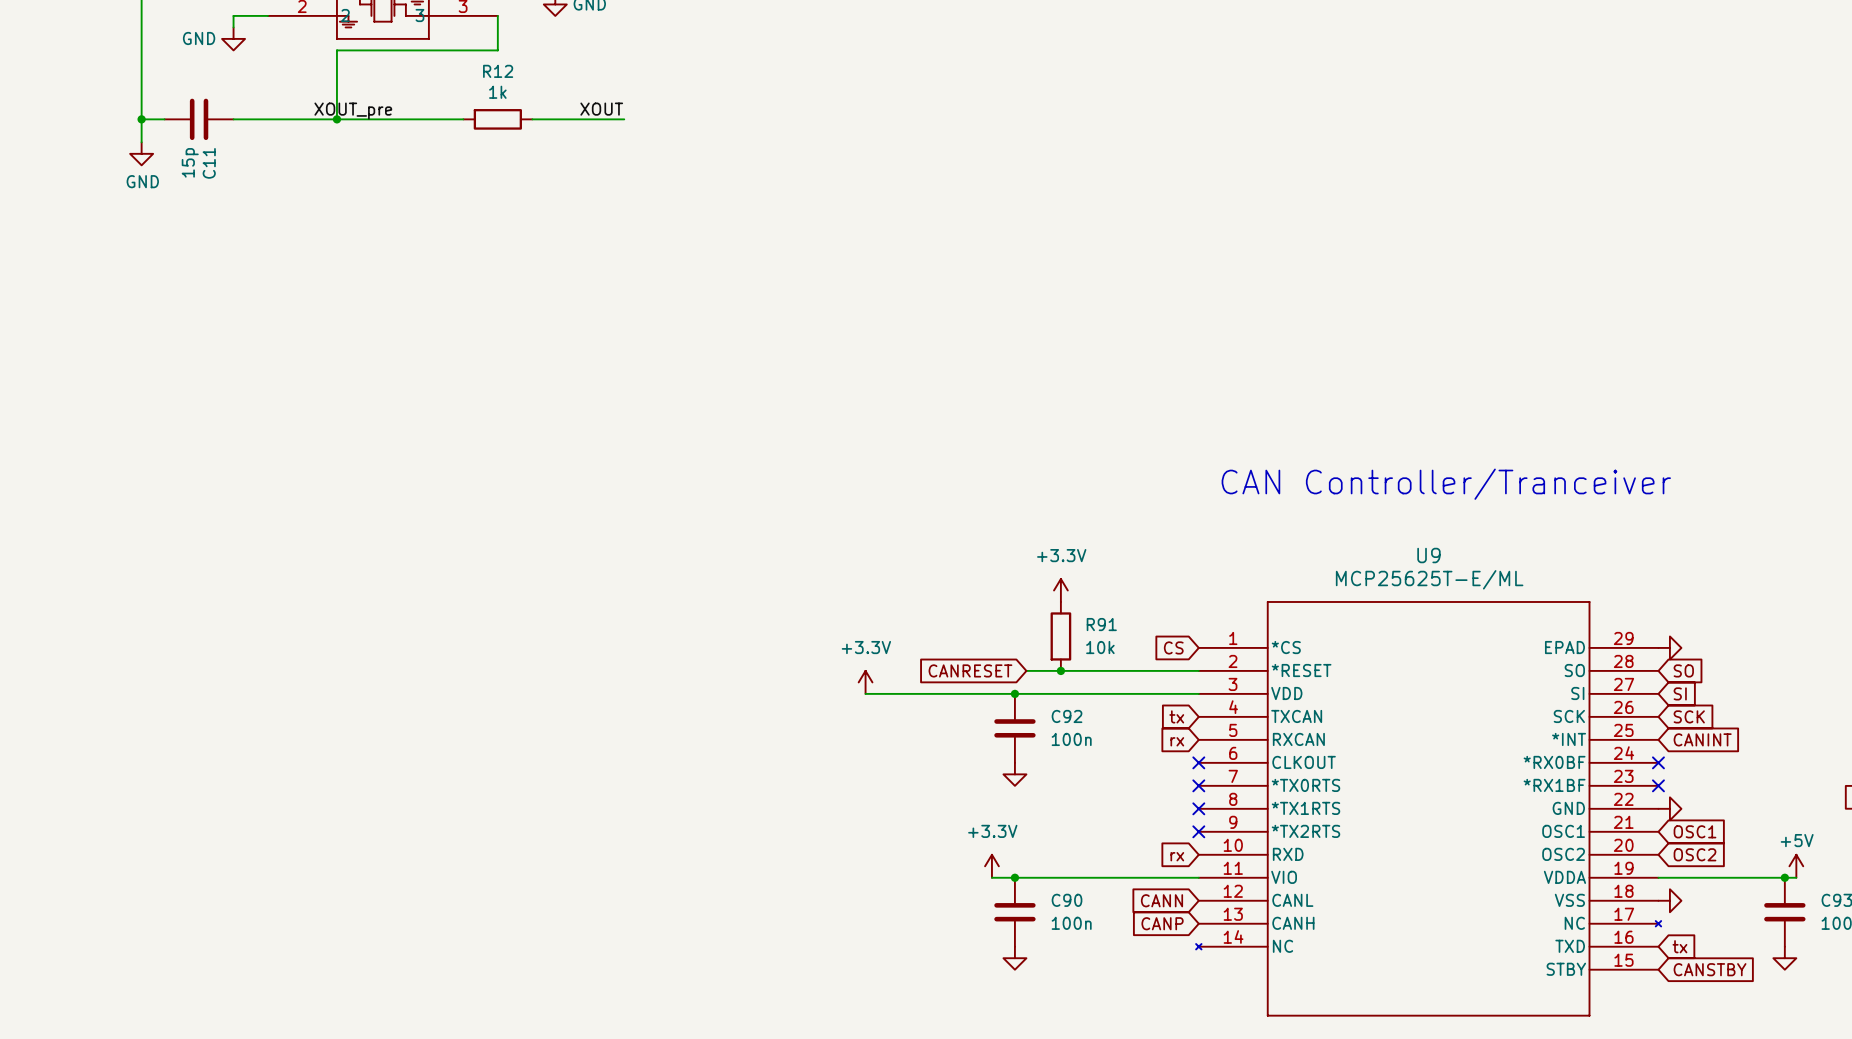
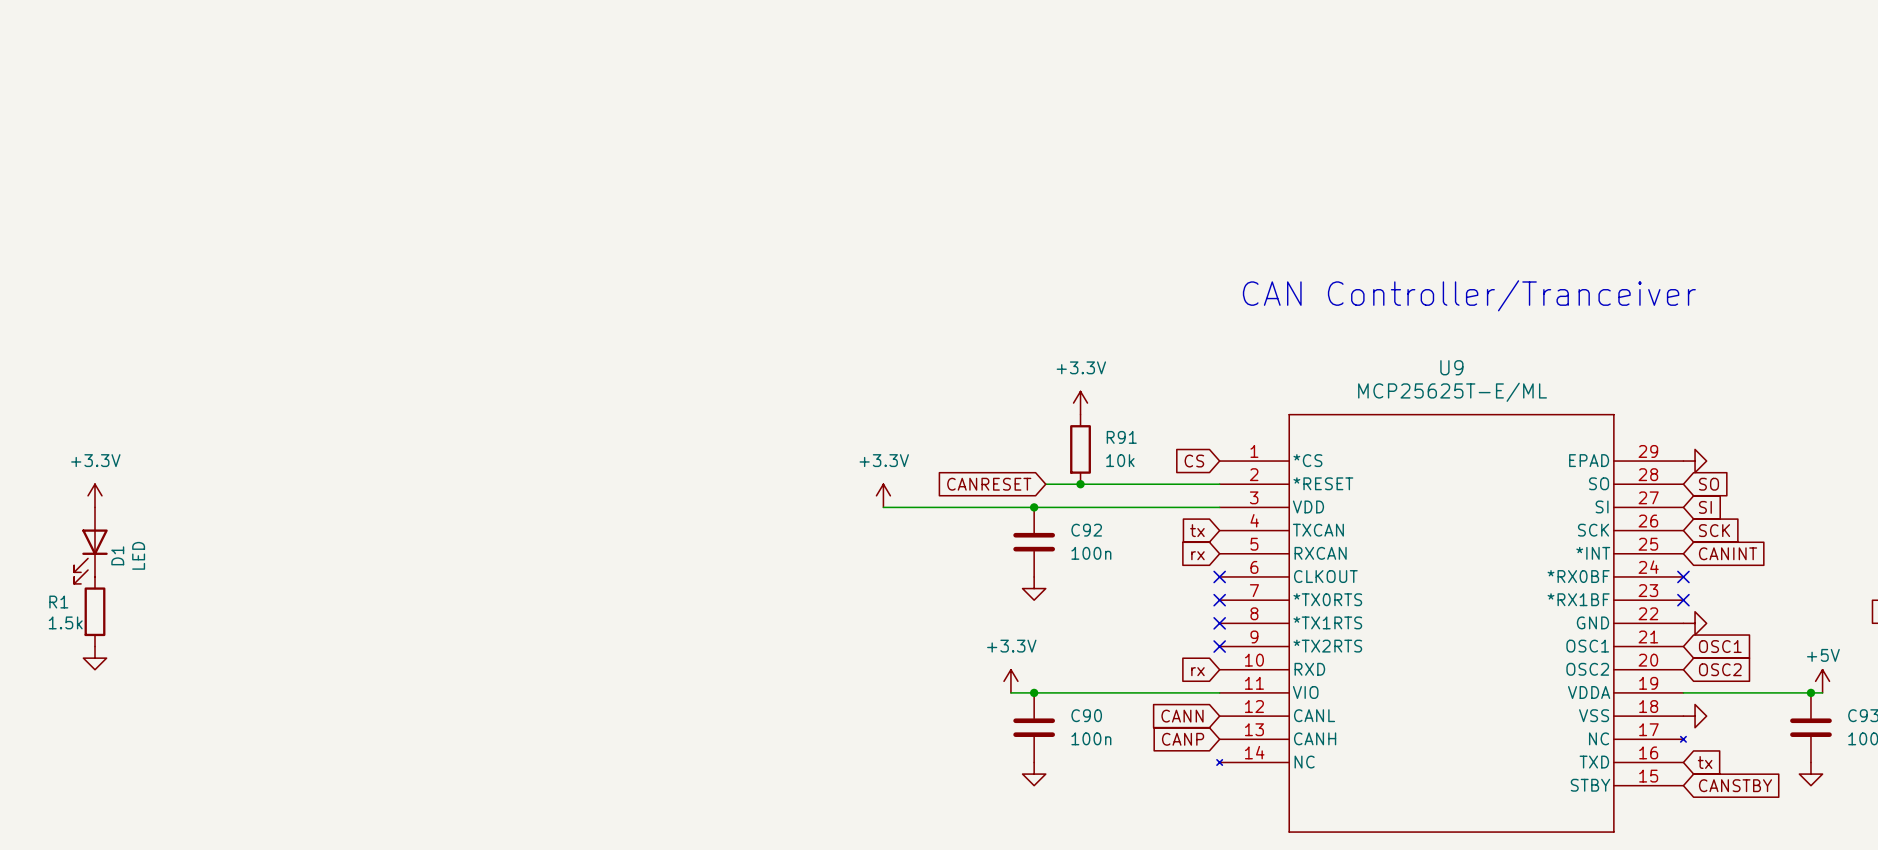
power symbol: none -> +3.3V (94, 495)
D1: none -> LED (90, 545)
R1: none -> 1.5k (94, 611)
power symbol: none -> (94, 658)

